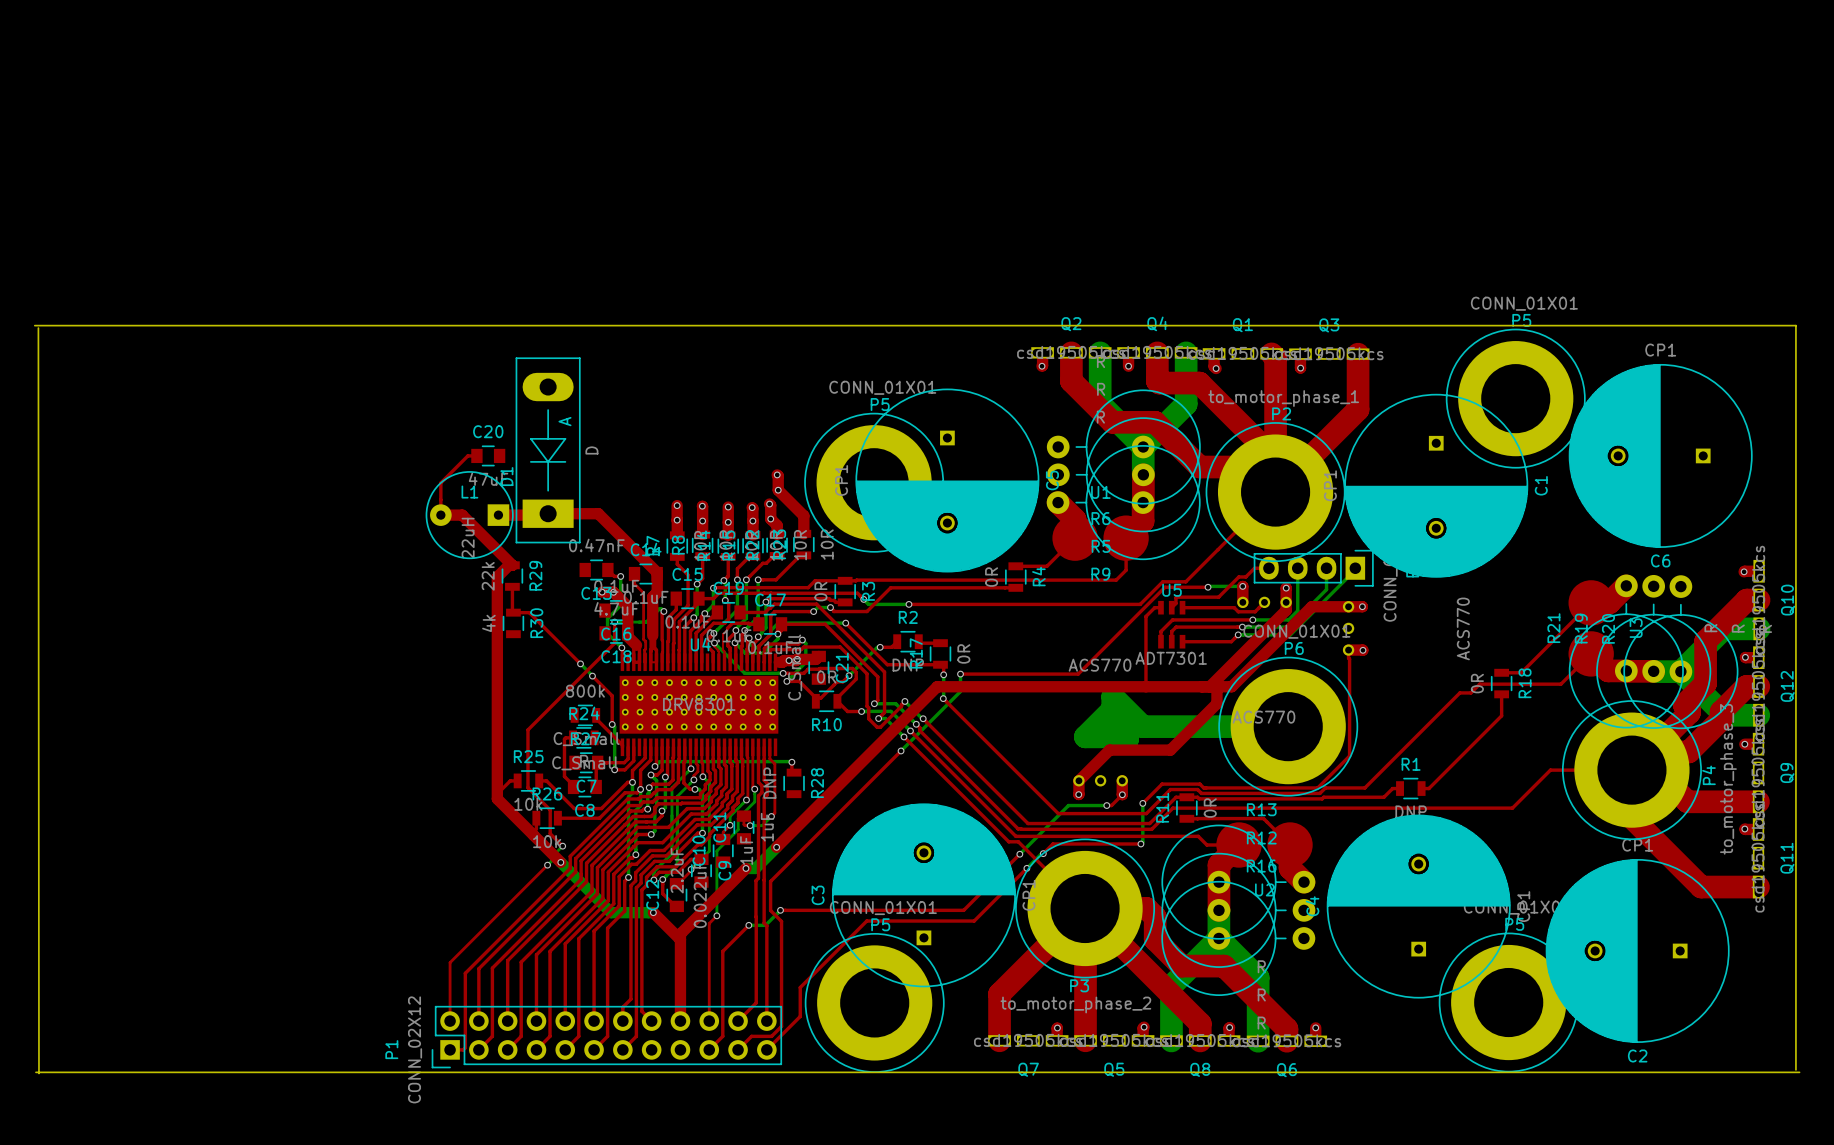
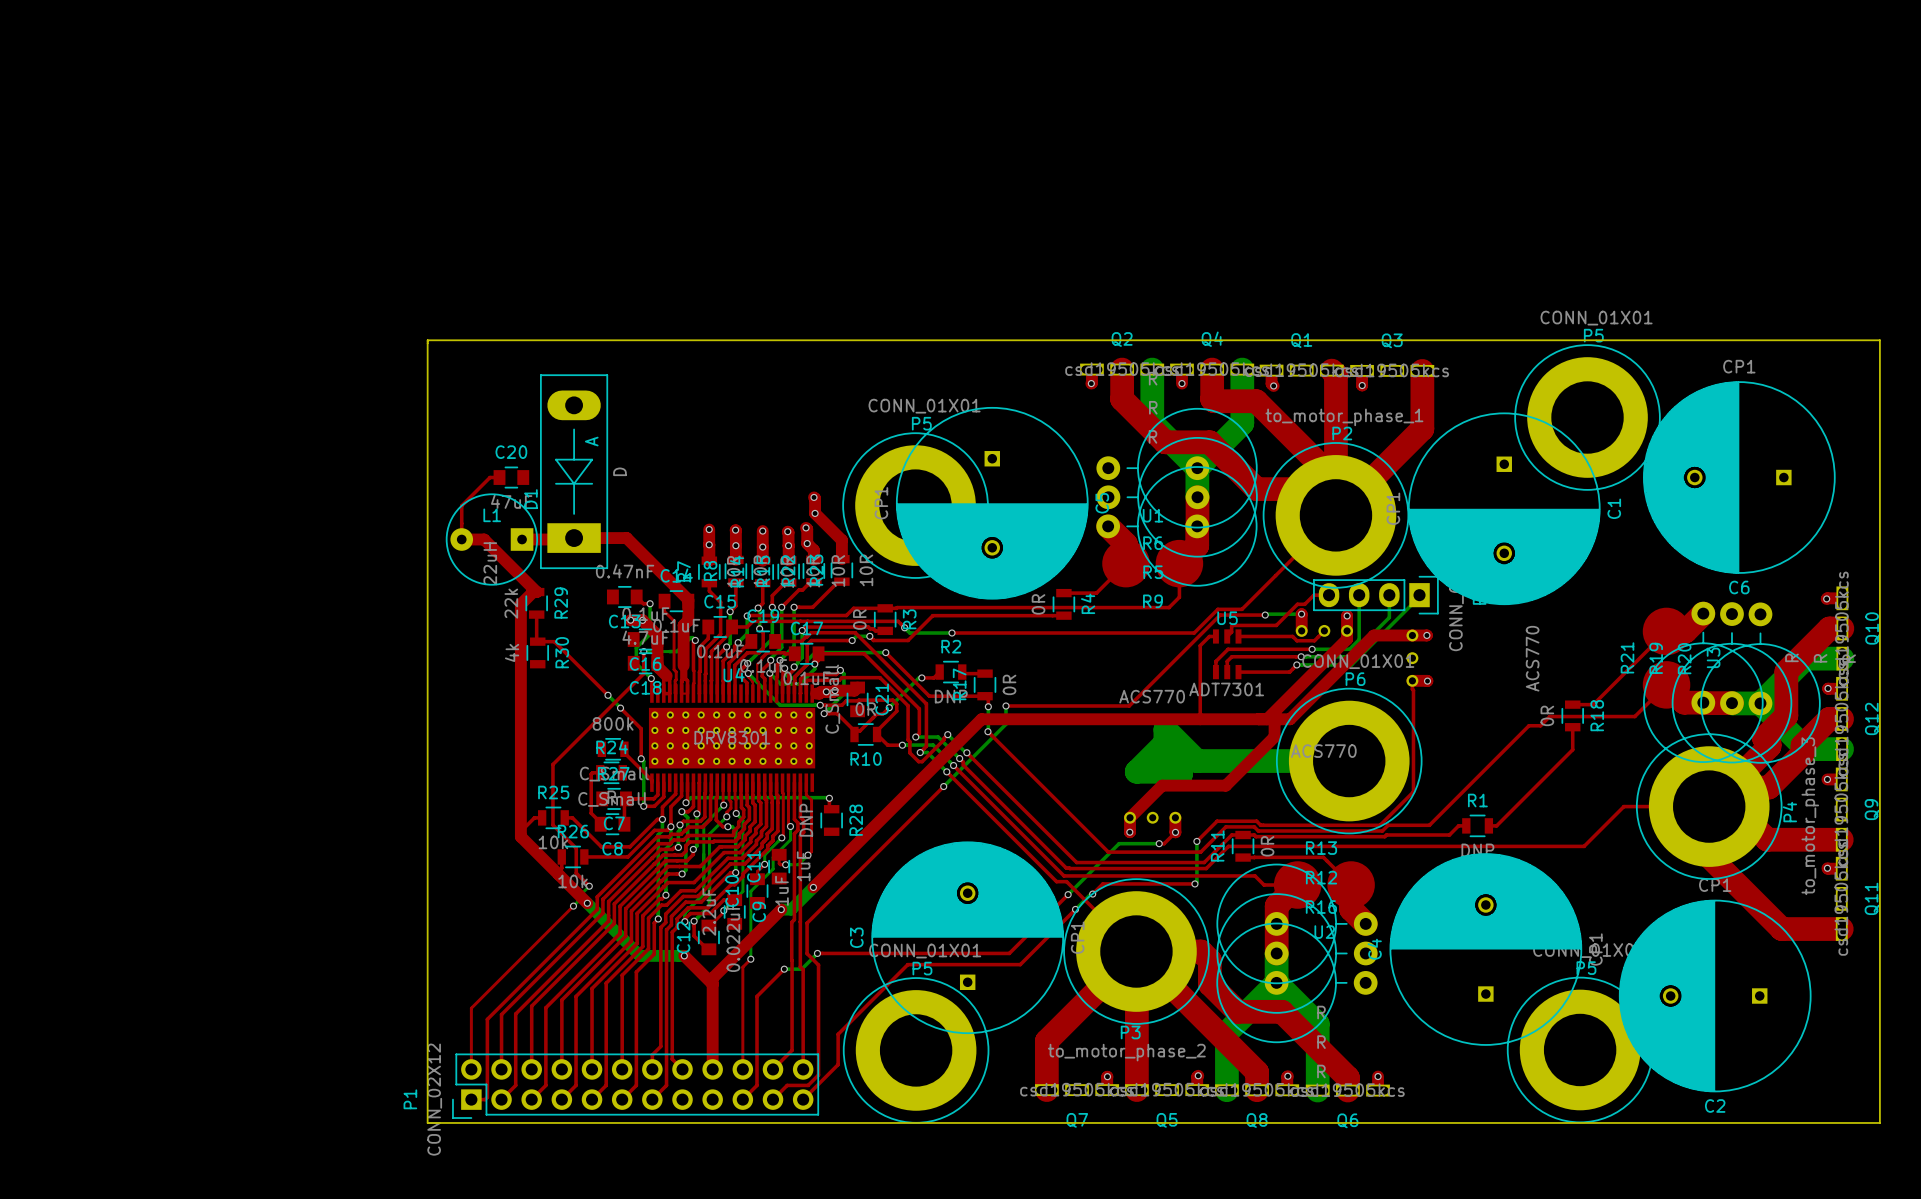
board edge: none -> (427, 340) (427, 1122) (1879, 1122) (1879, 340) (427, 340)
board edge: (34, 325) (1795, 325) (1795, 1069) -> none
board edge: (38, 328) (39, 1072) -> none
board edge: (35, 1072) (1799, 1072) -> none

